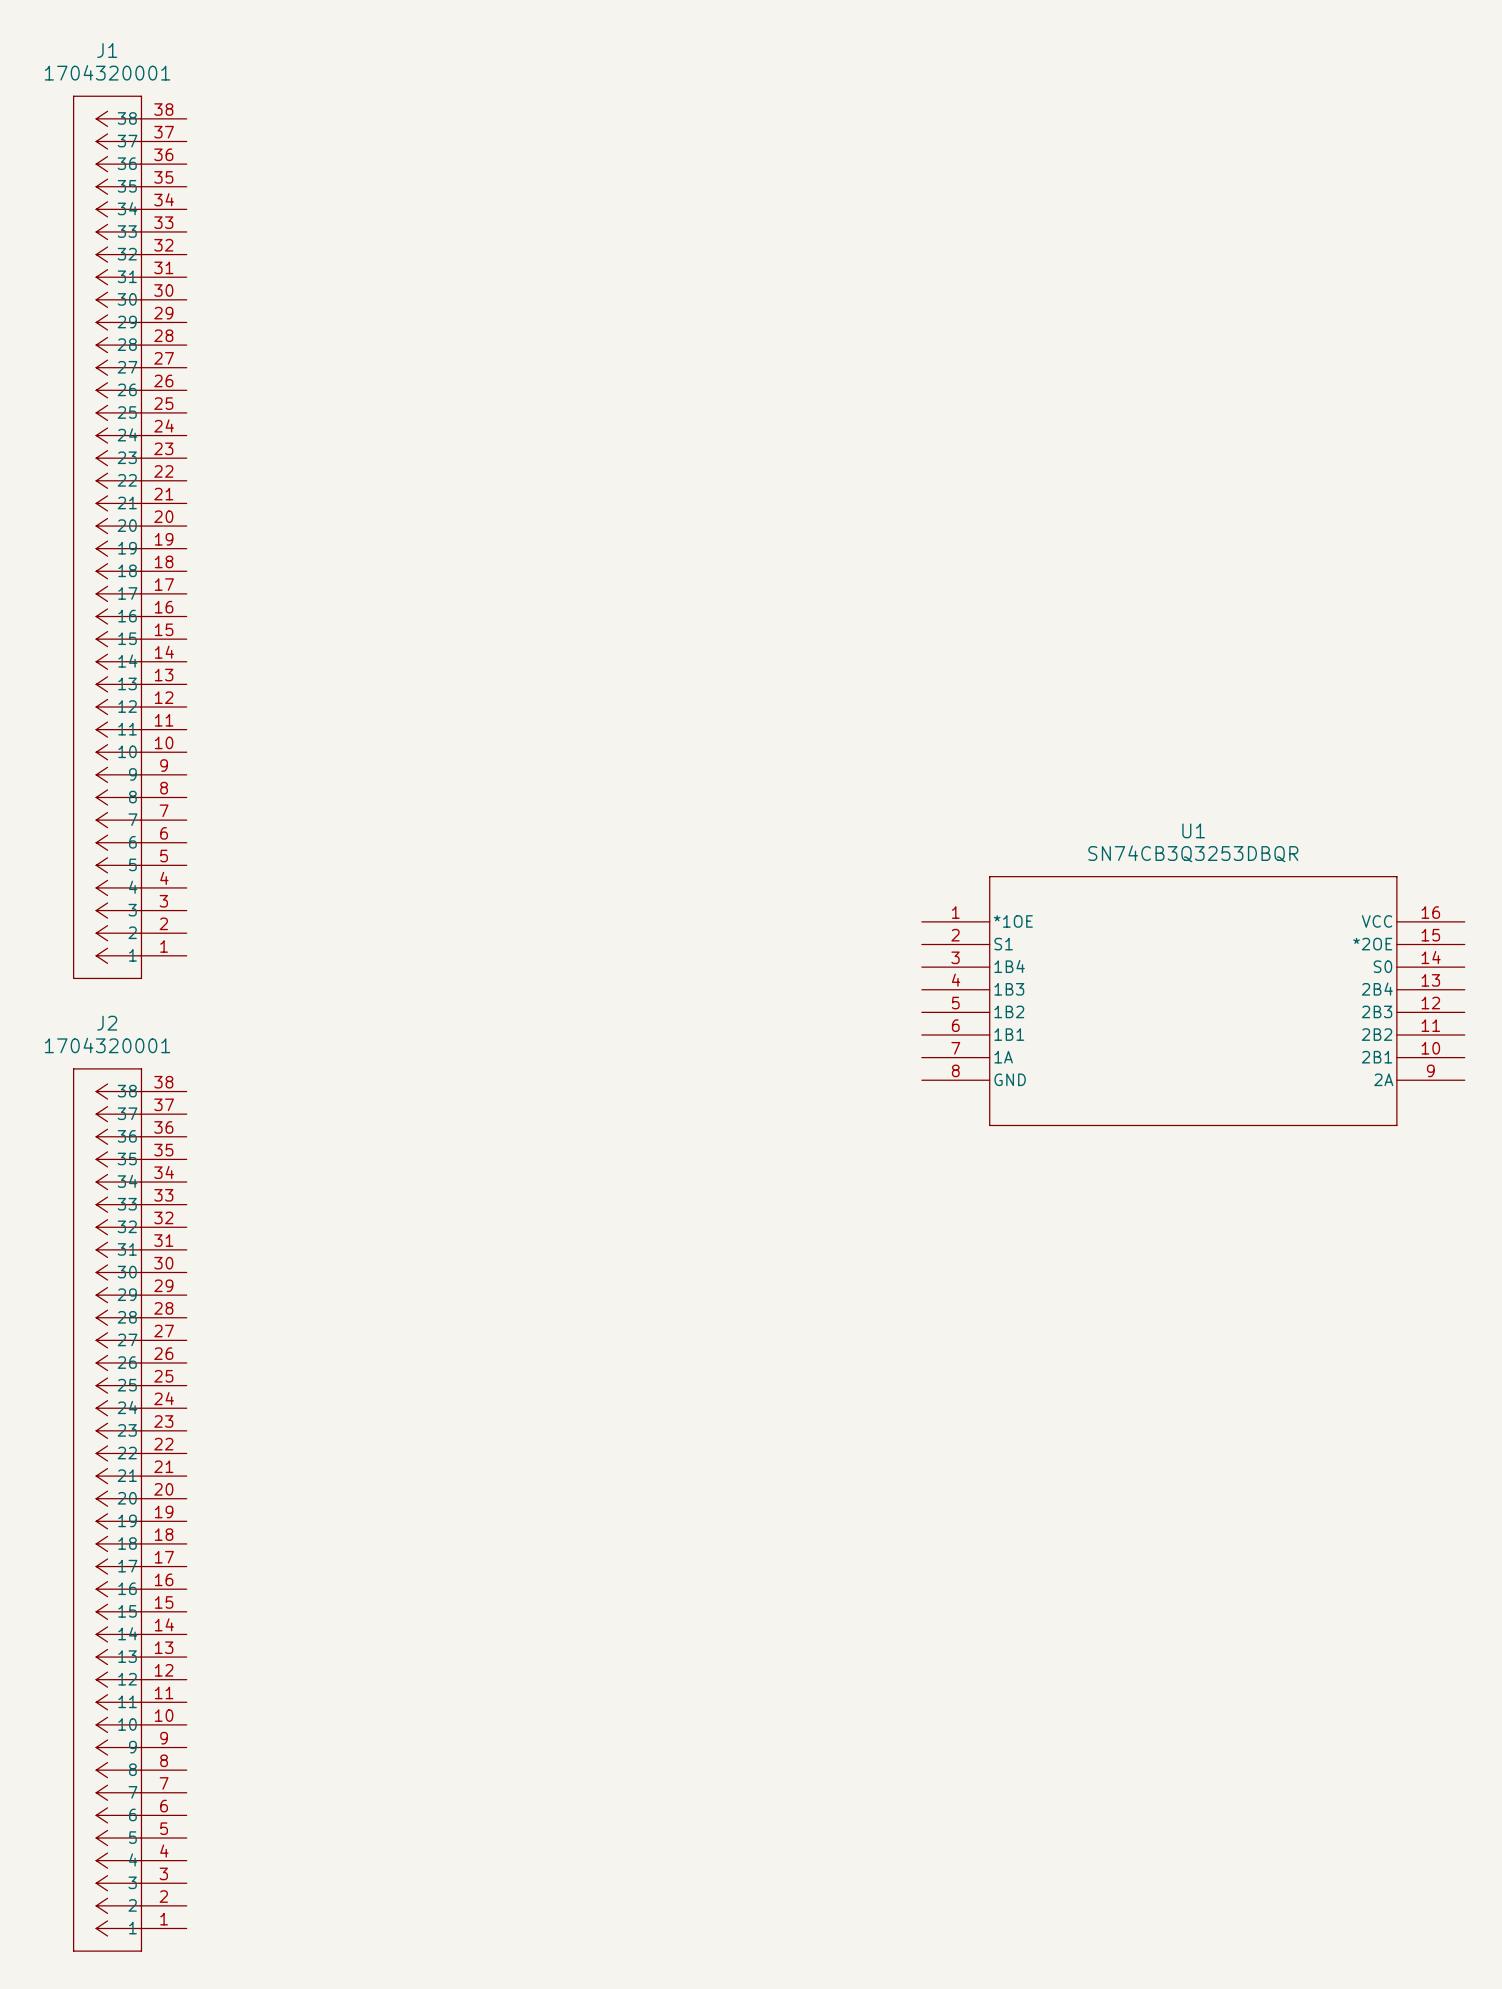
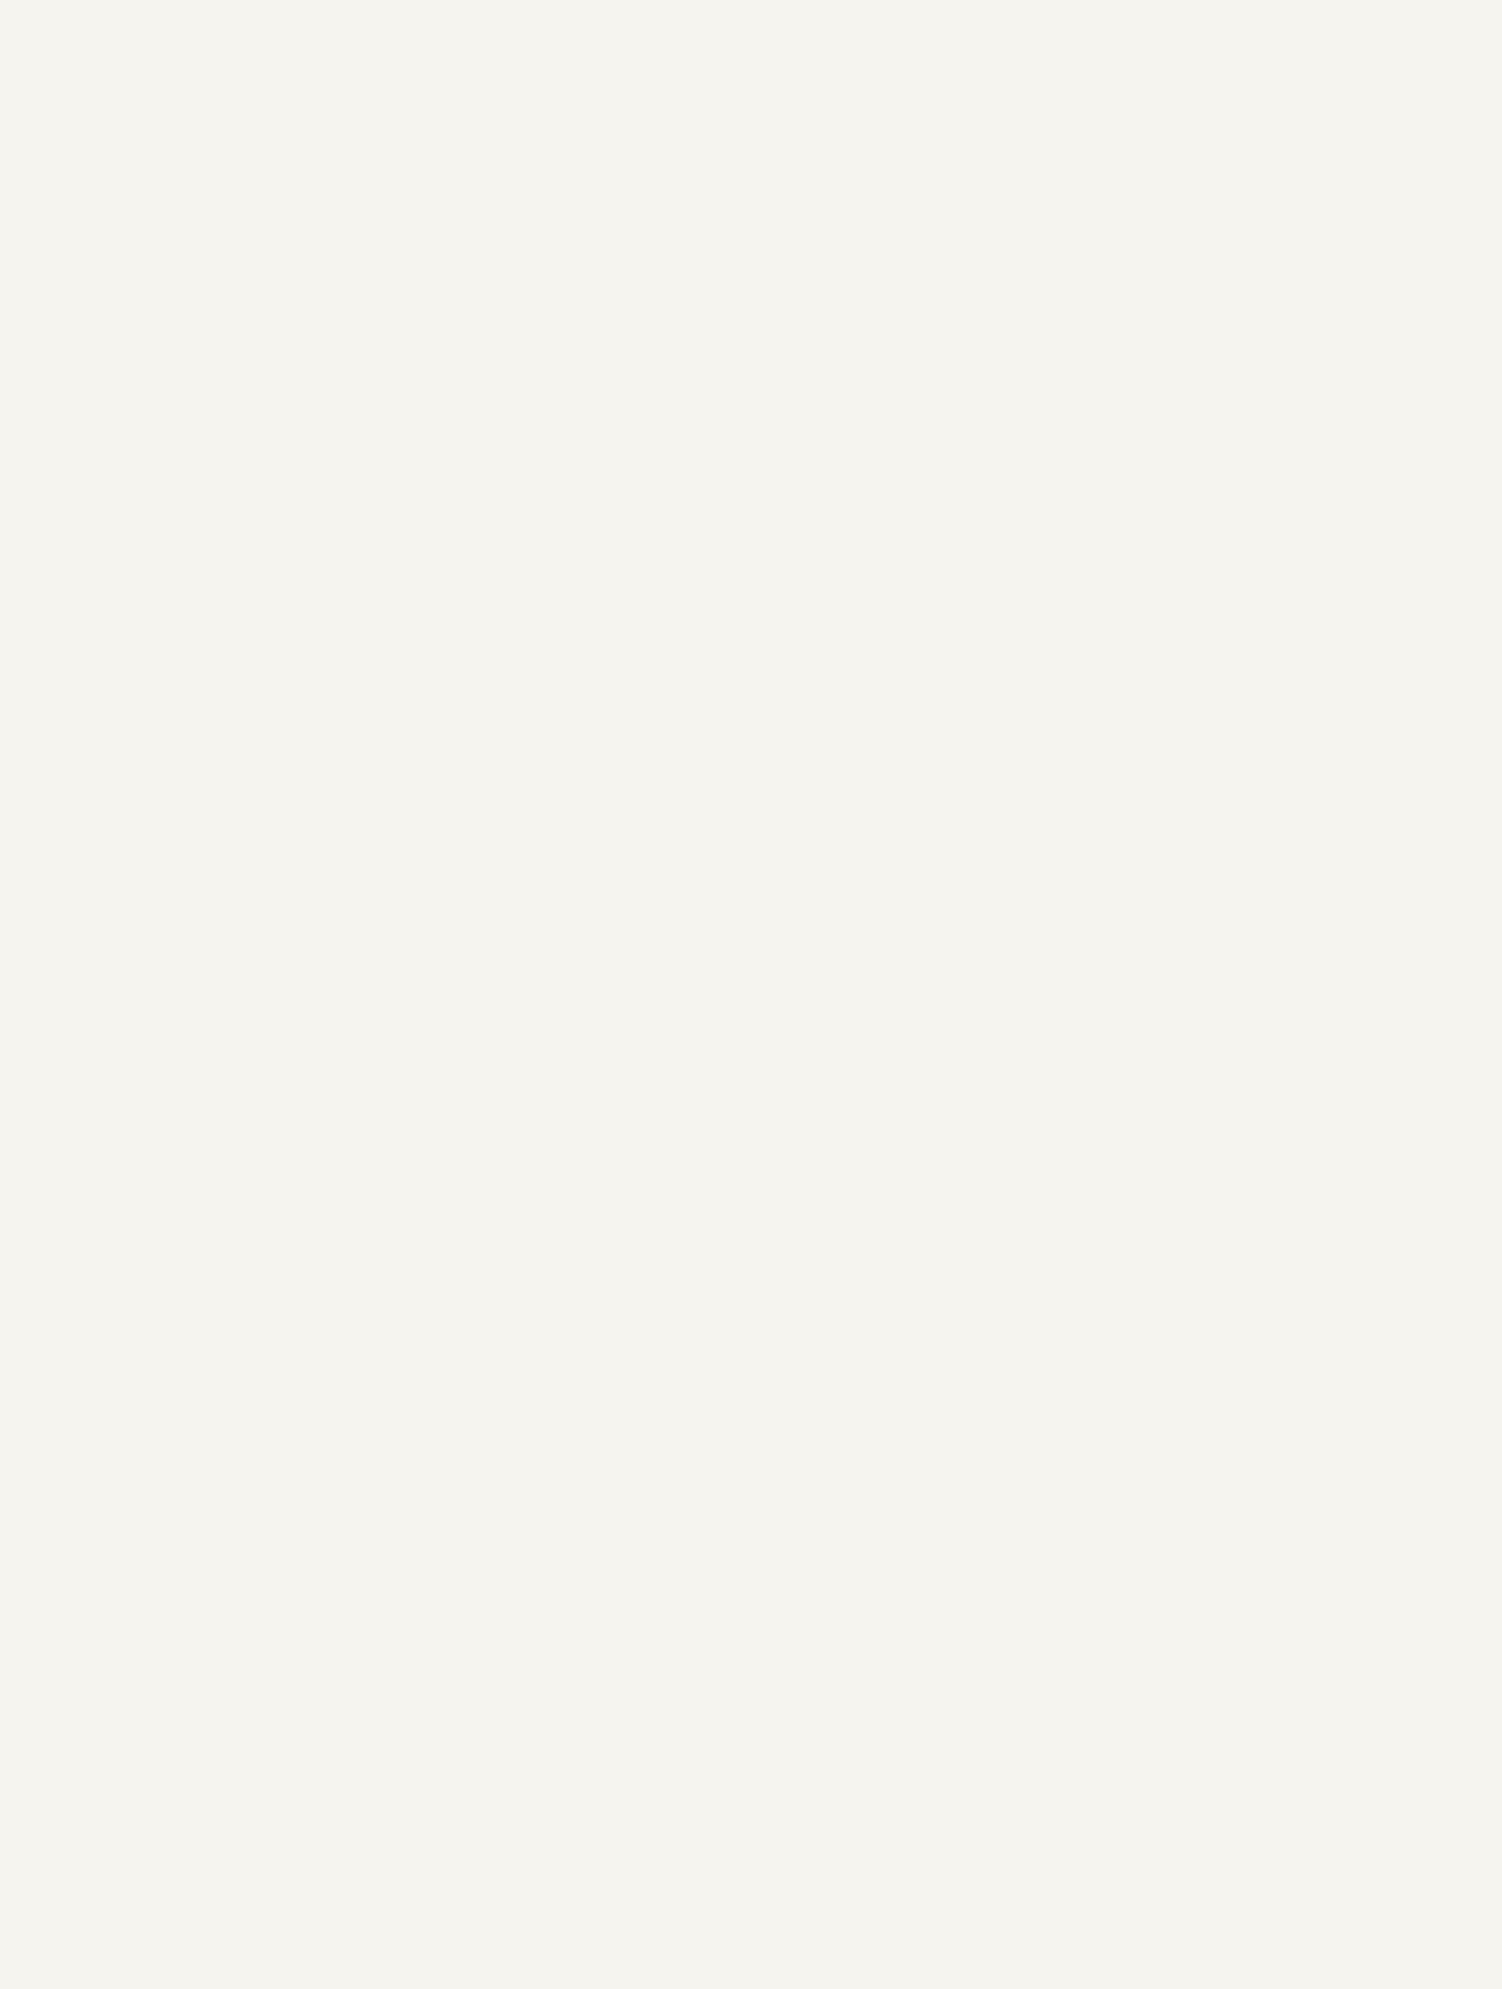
J1: 1704320001 (129, 537) -> none
U1: SN74CB3Q3253DBQR (1193, 1001) -> none
J2: 1704320001 (129, 1510) -> none

